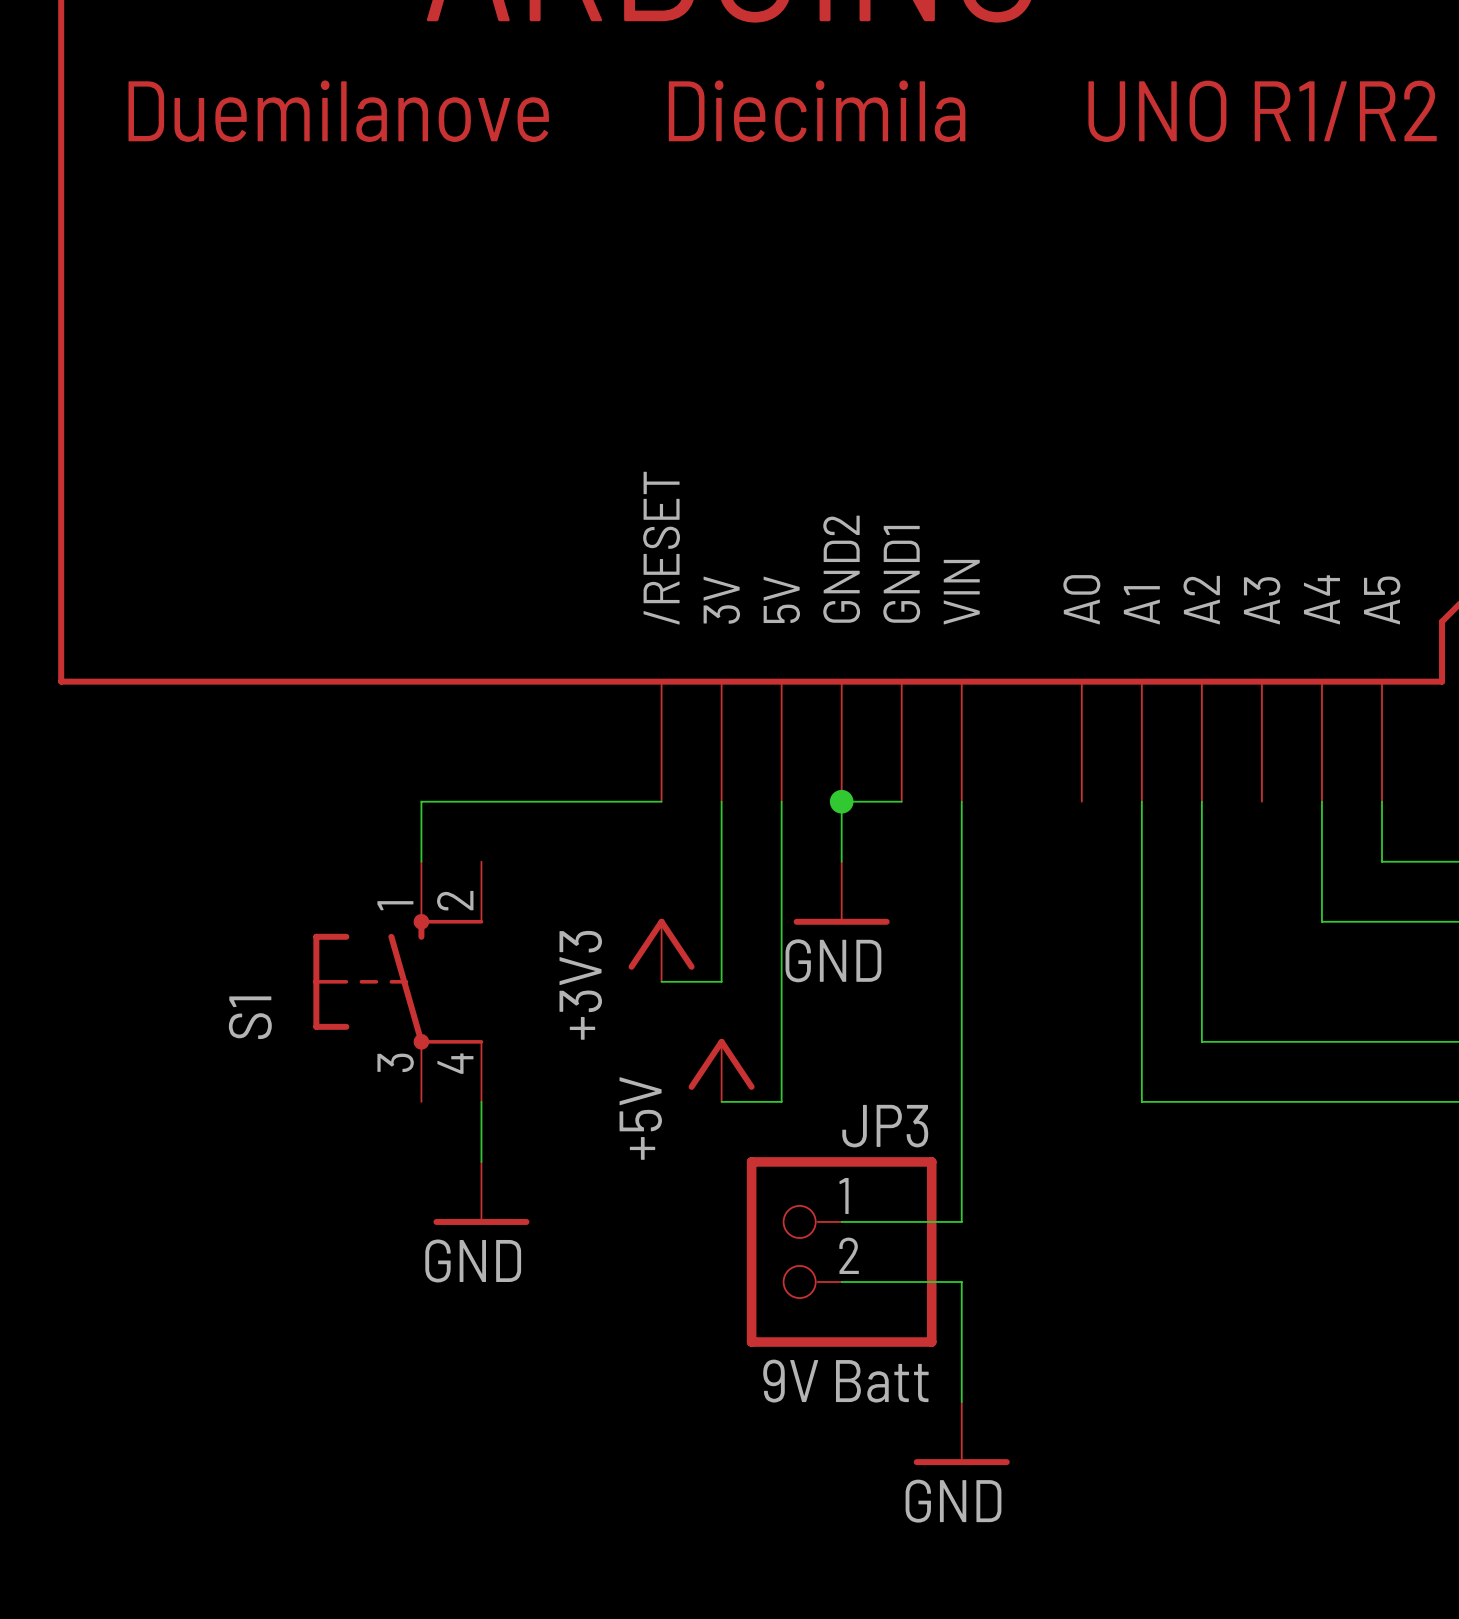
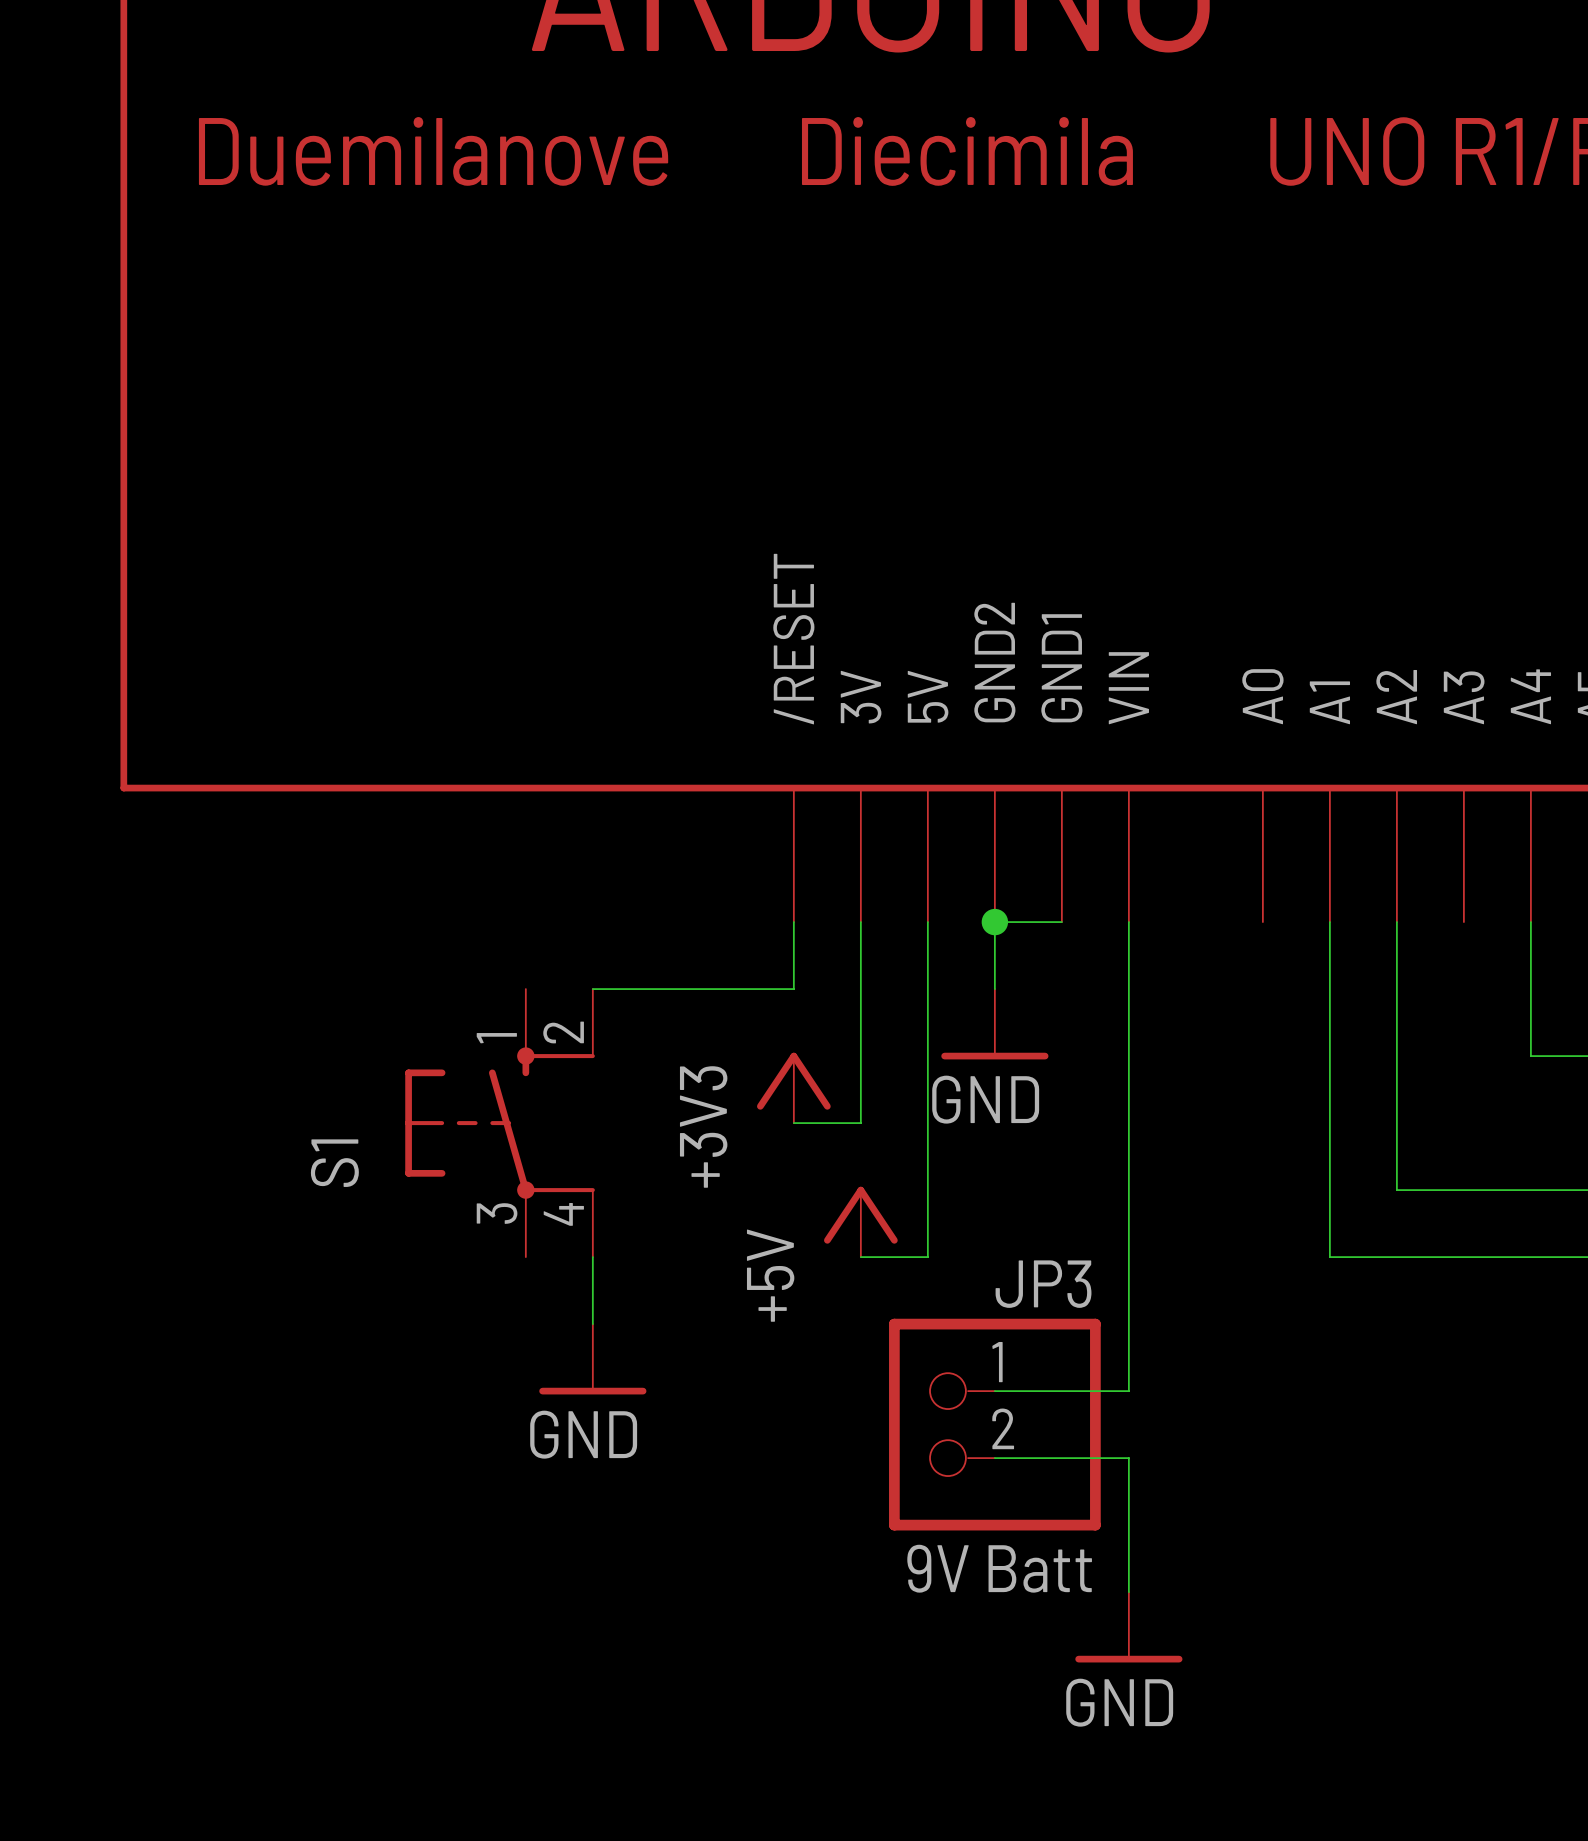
wire: (661, 801) (421, 801) (421, 861) -> (793, 922) (793, 989) (592, 989)

